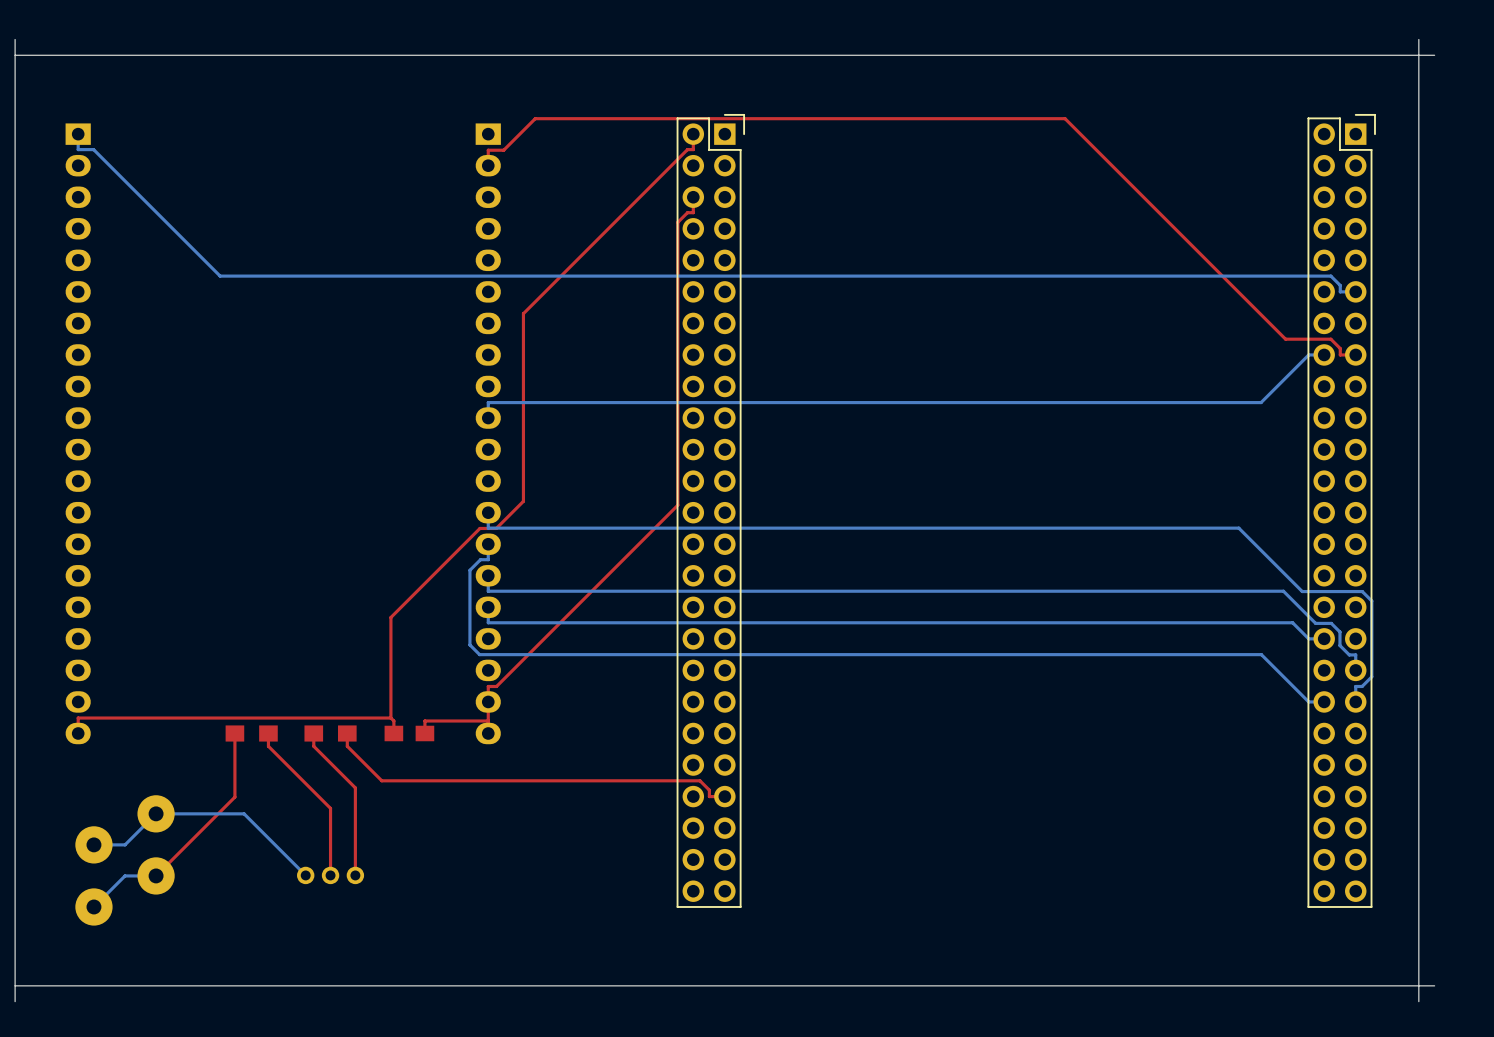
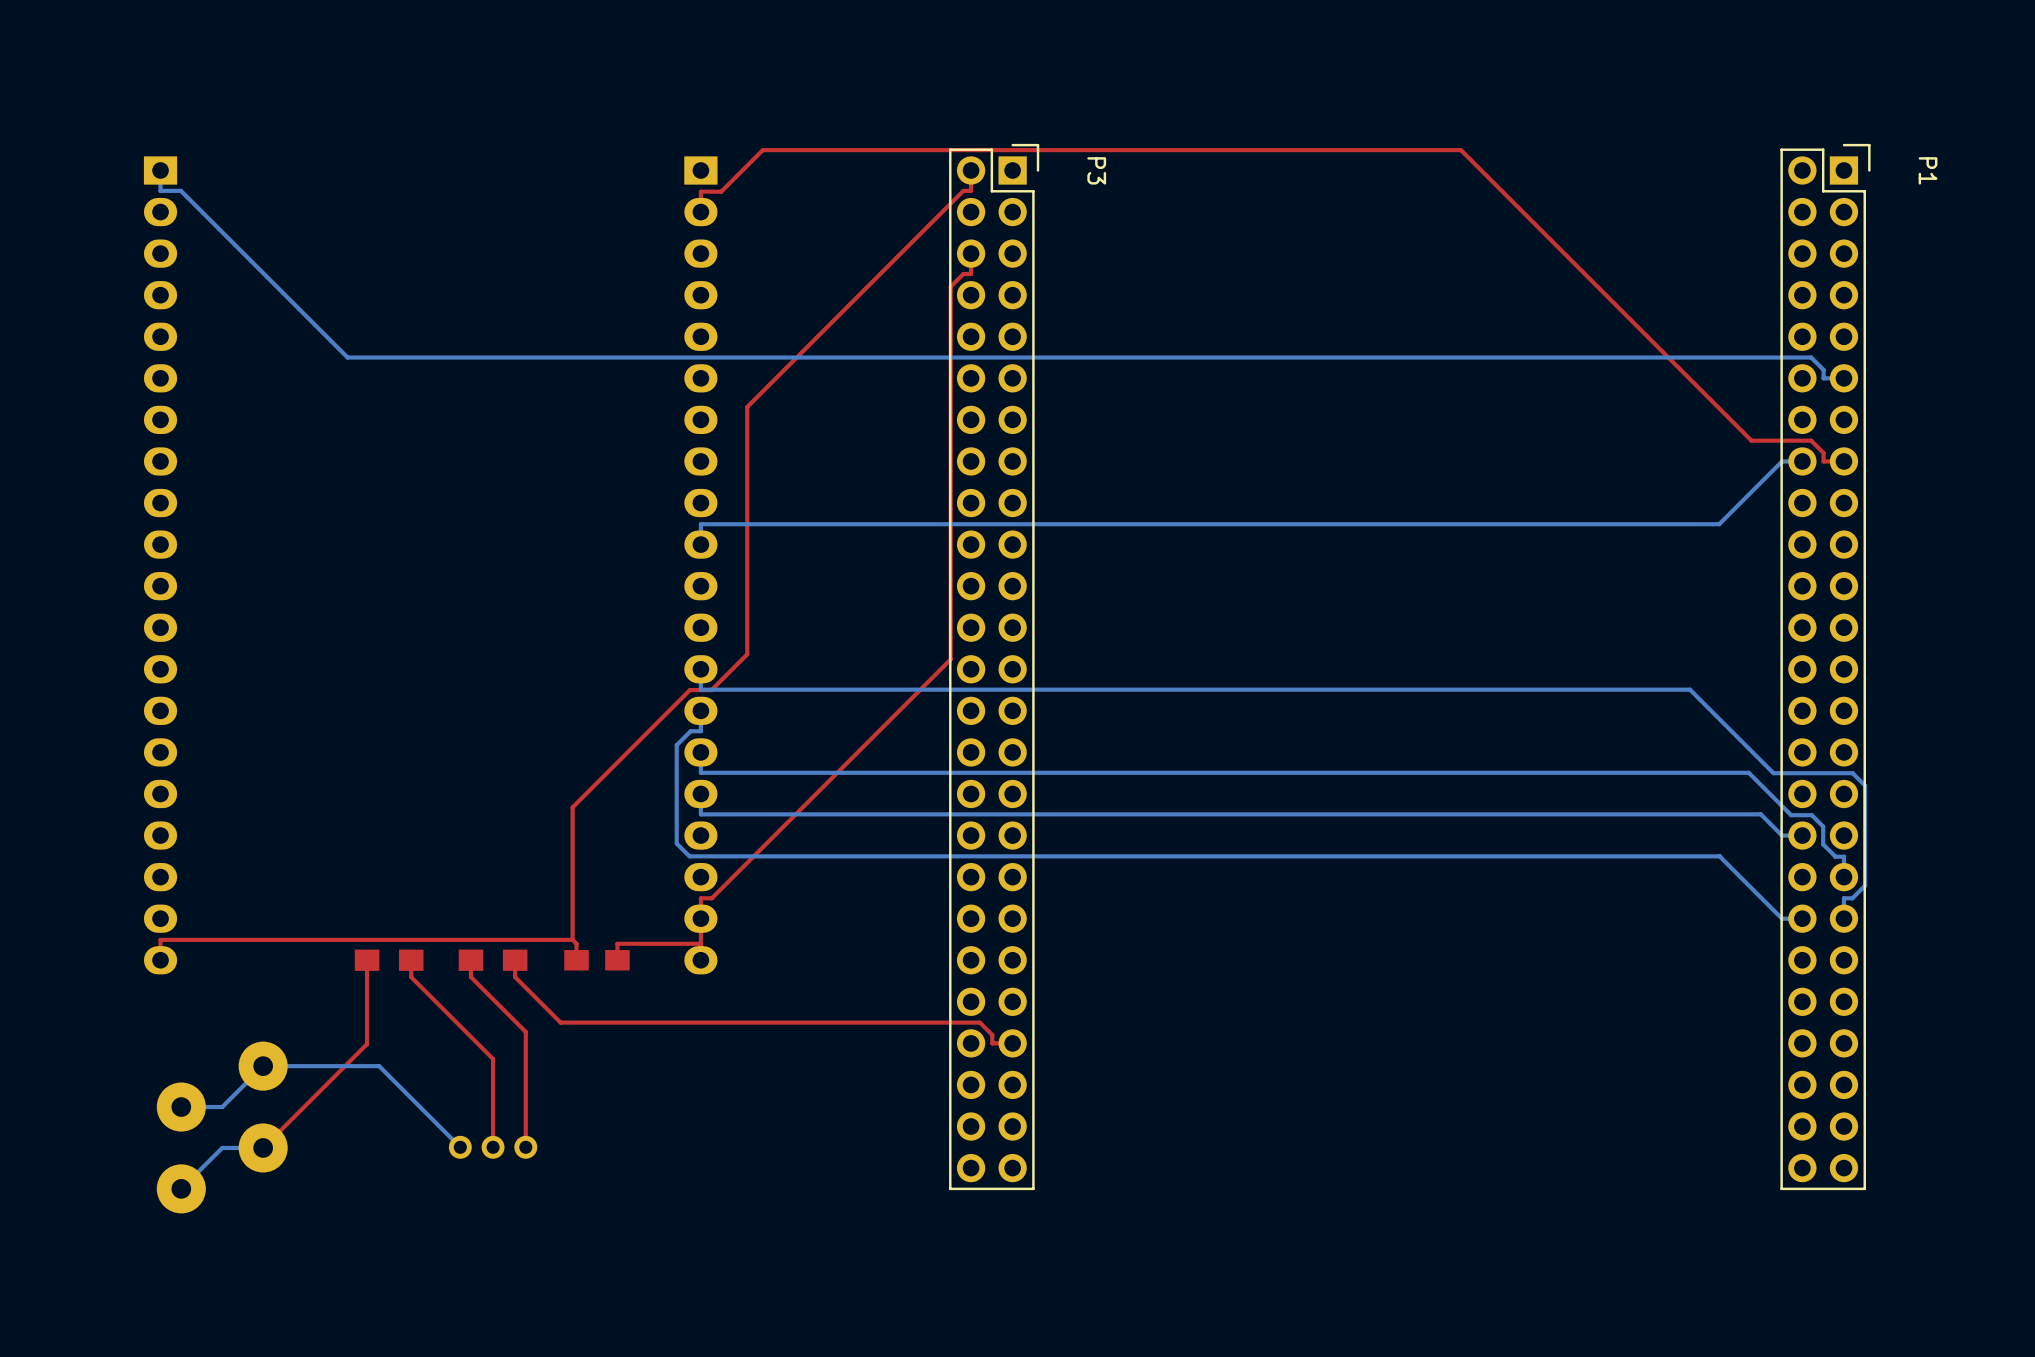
board edge: (15, 39) (15, 1001) -> none
board edge: (1418, 39) (1418, 1001) -> none
board edge: (1434, 55) (15, 55) -> none
P3 name: none -> P3 (1096, 170)
P1 name: none -> P1 (1928, 170)
board edge: (1434, 985) (15, 985) -> none

